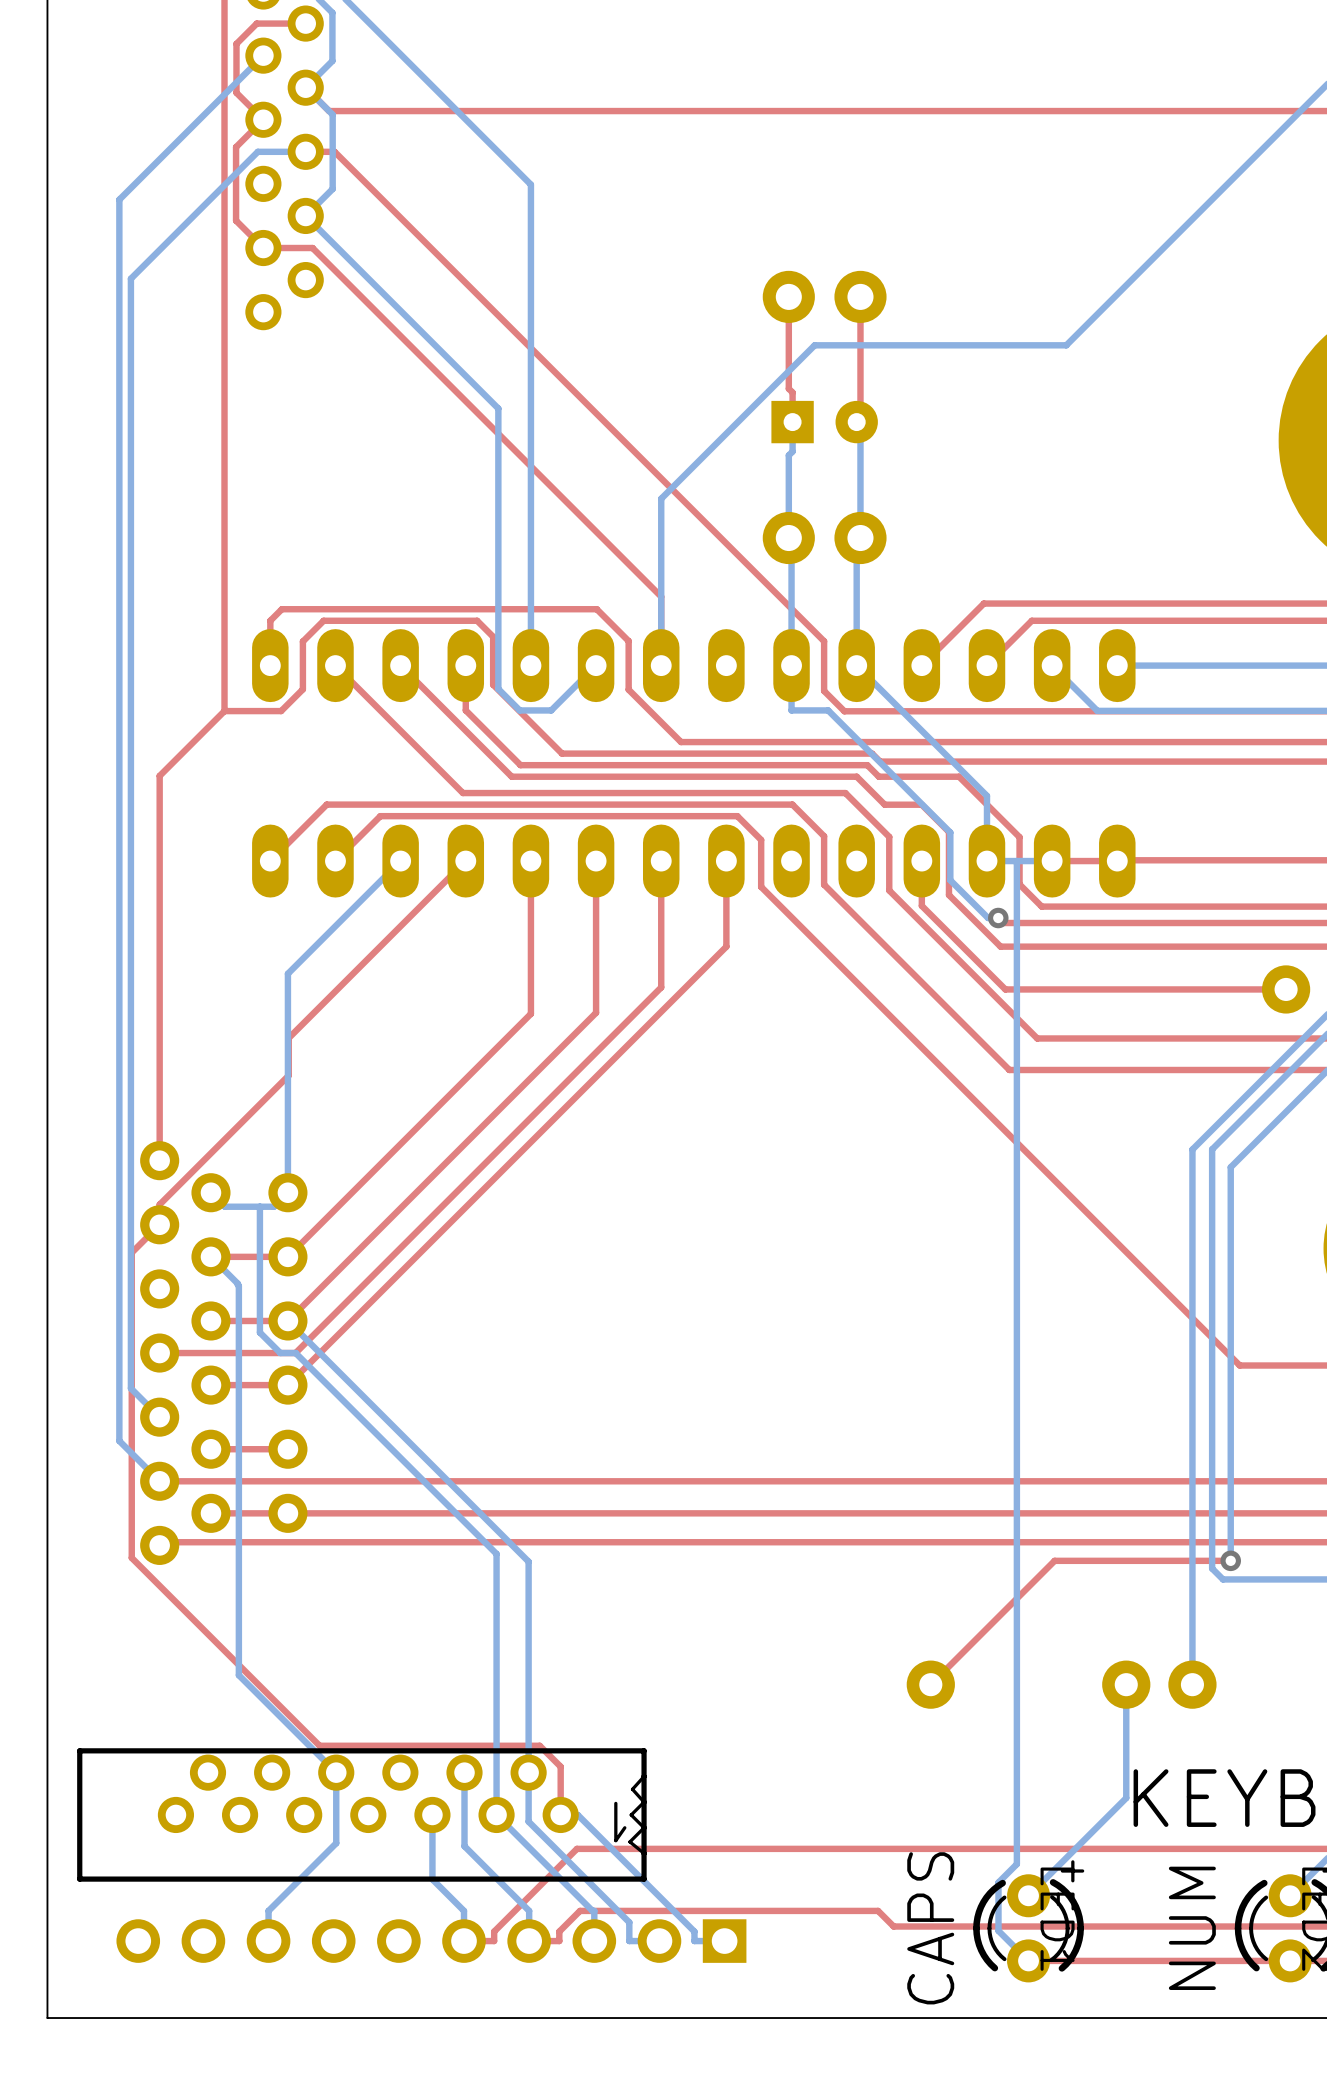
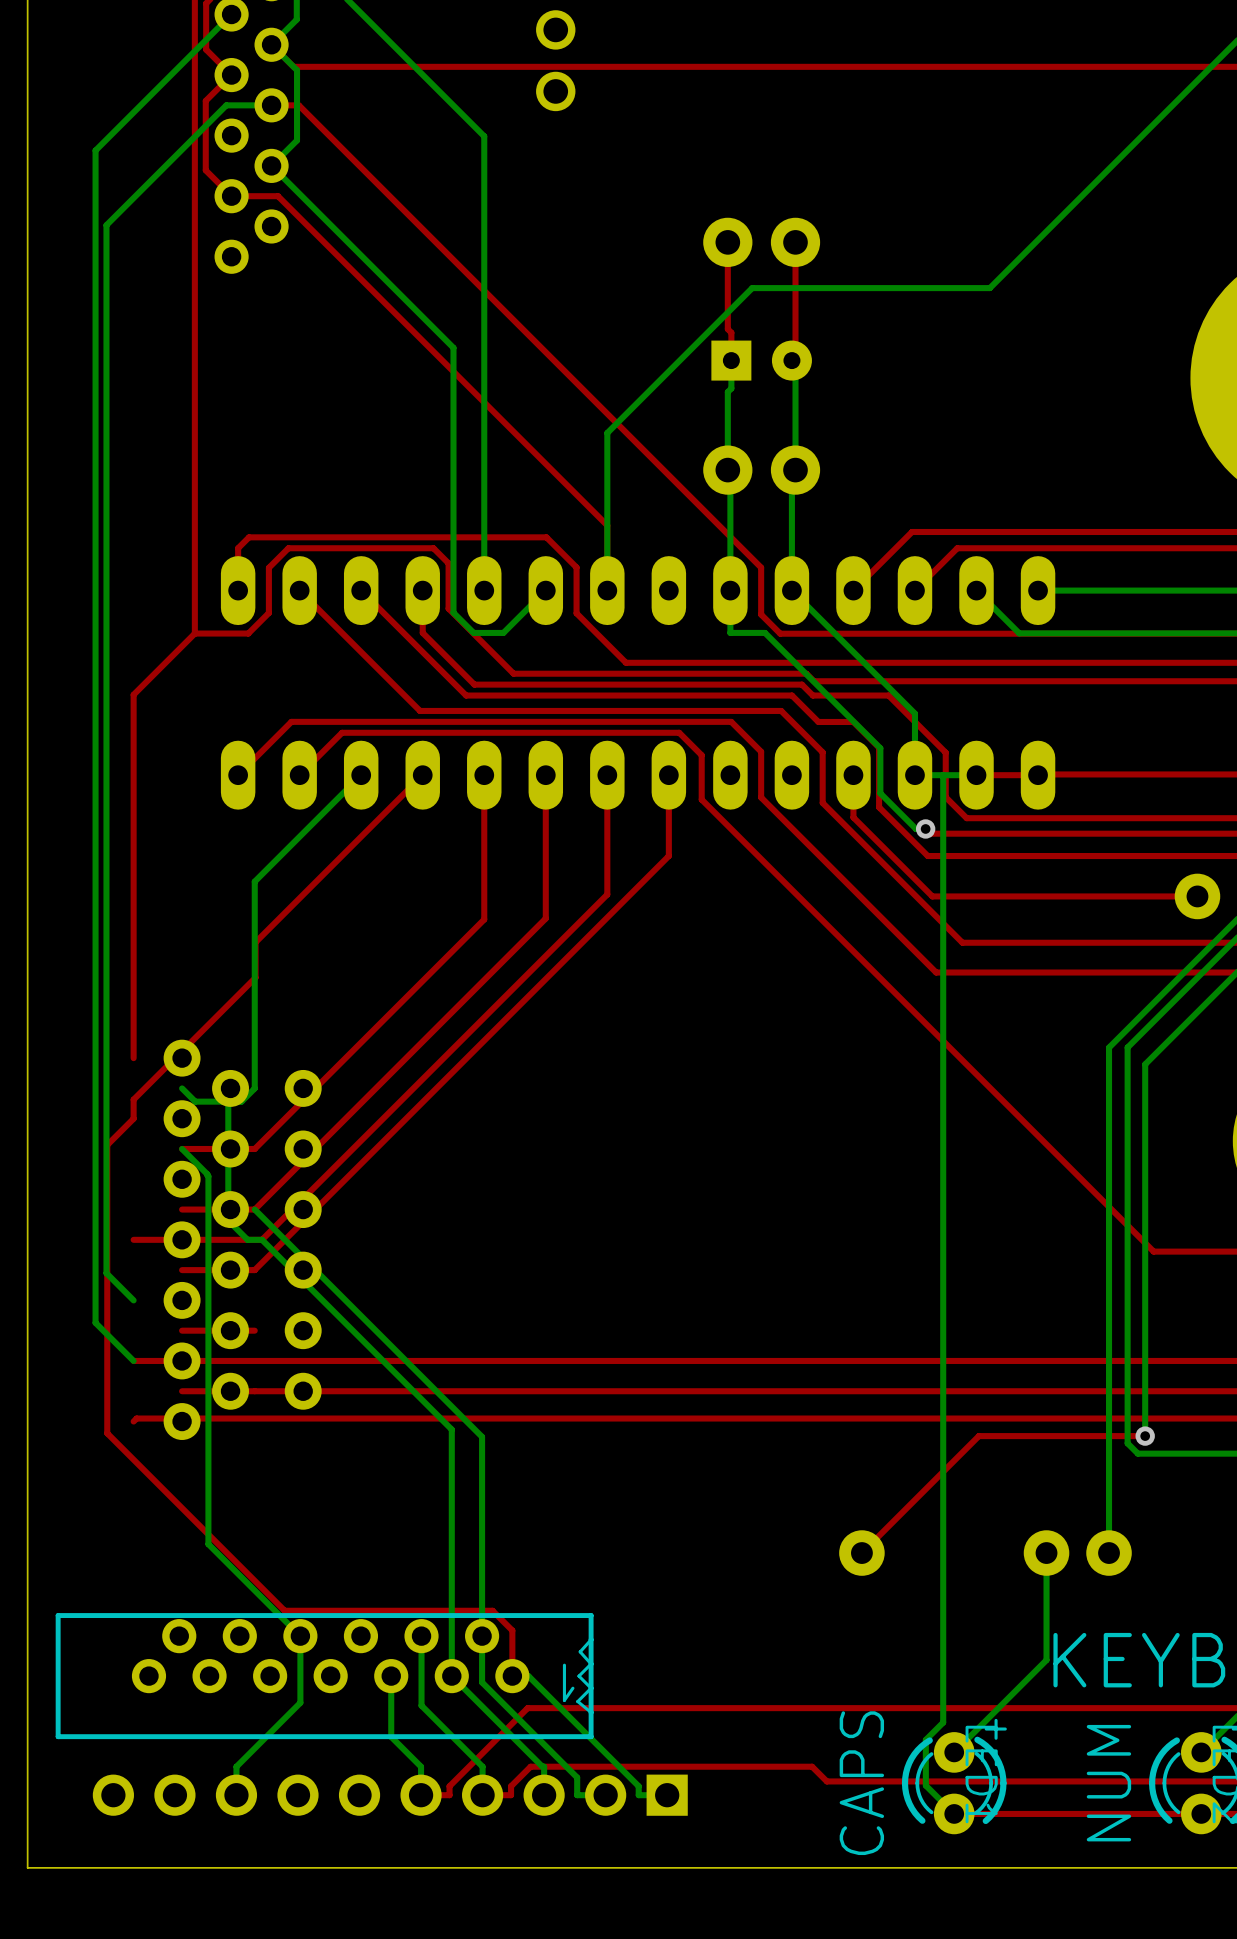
part: none -> (555, 60)
part position: (223, 1353) -> (242, 1239)

